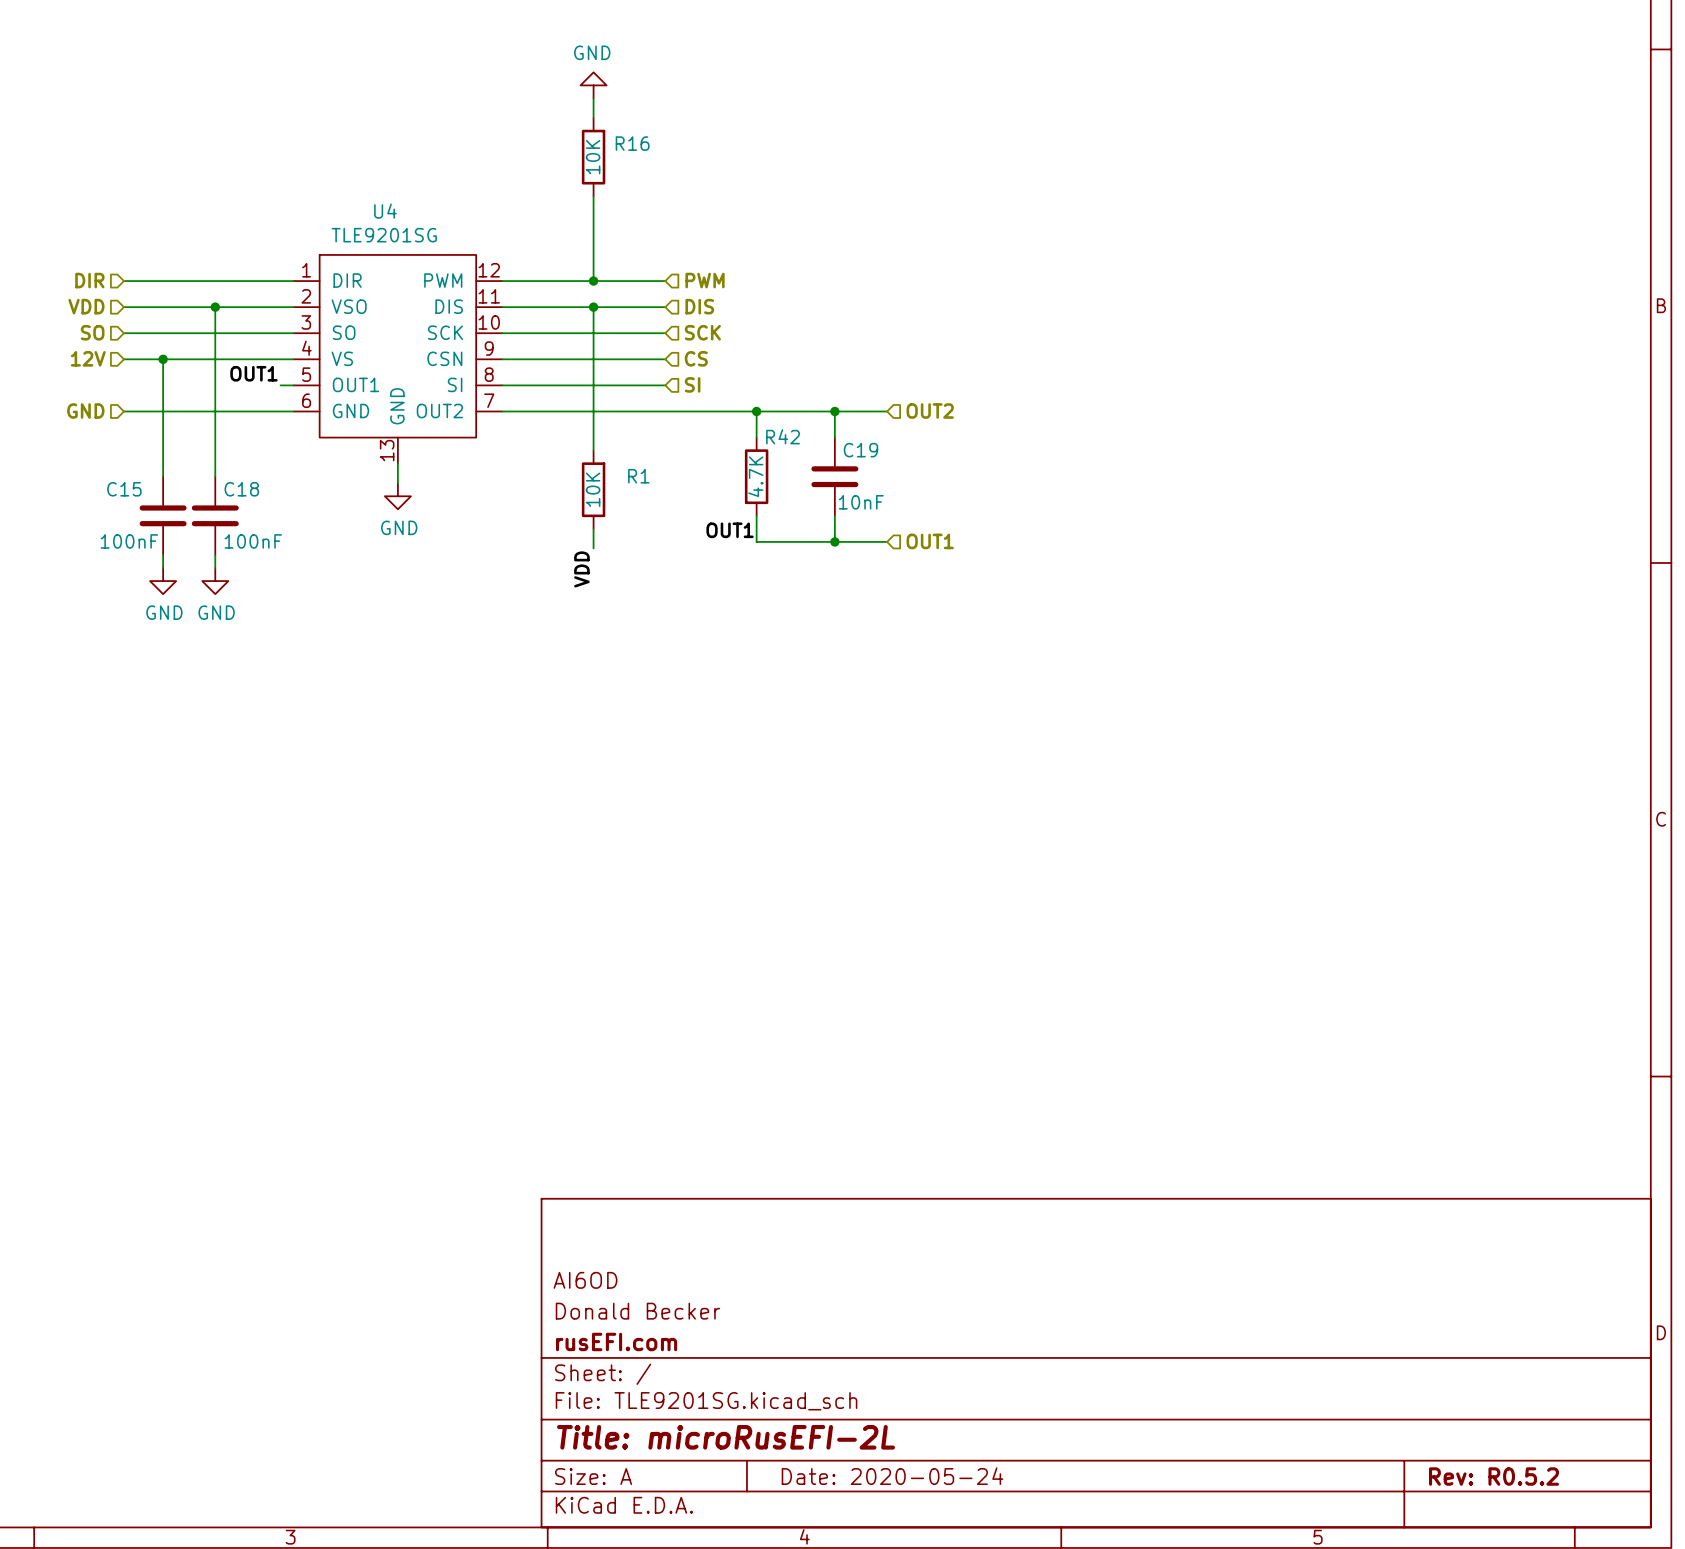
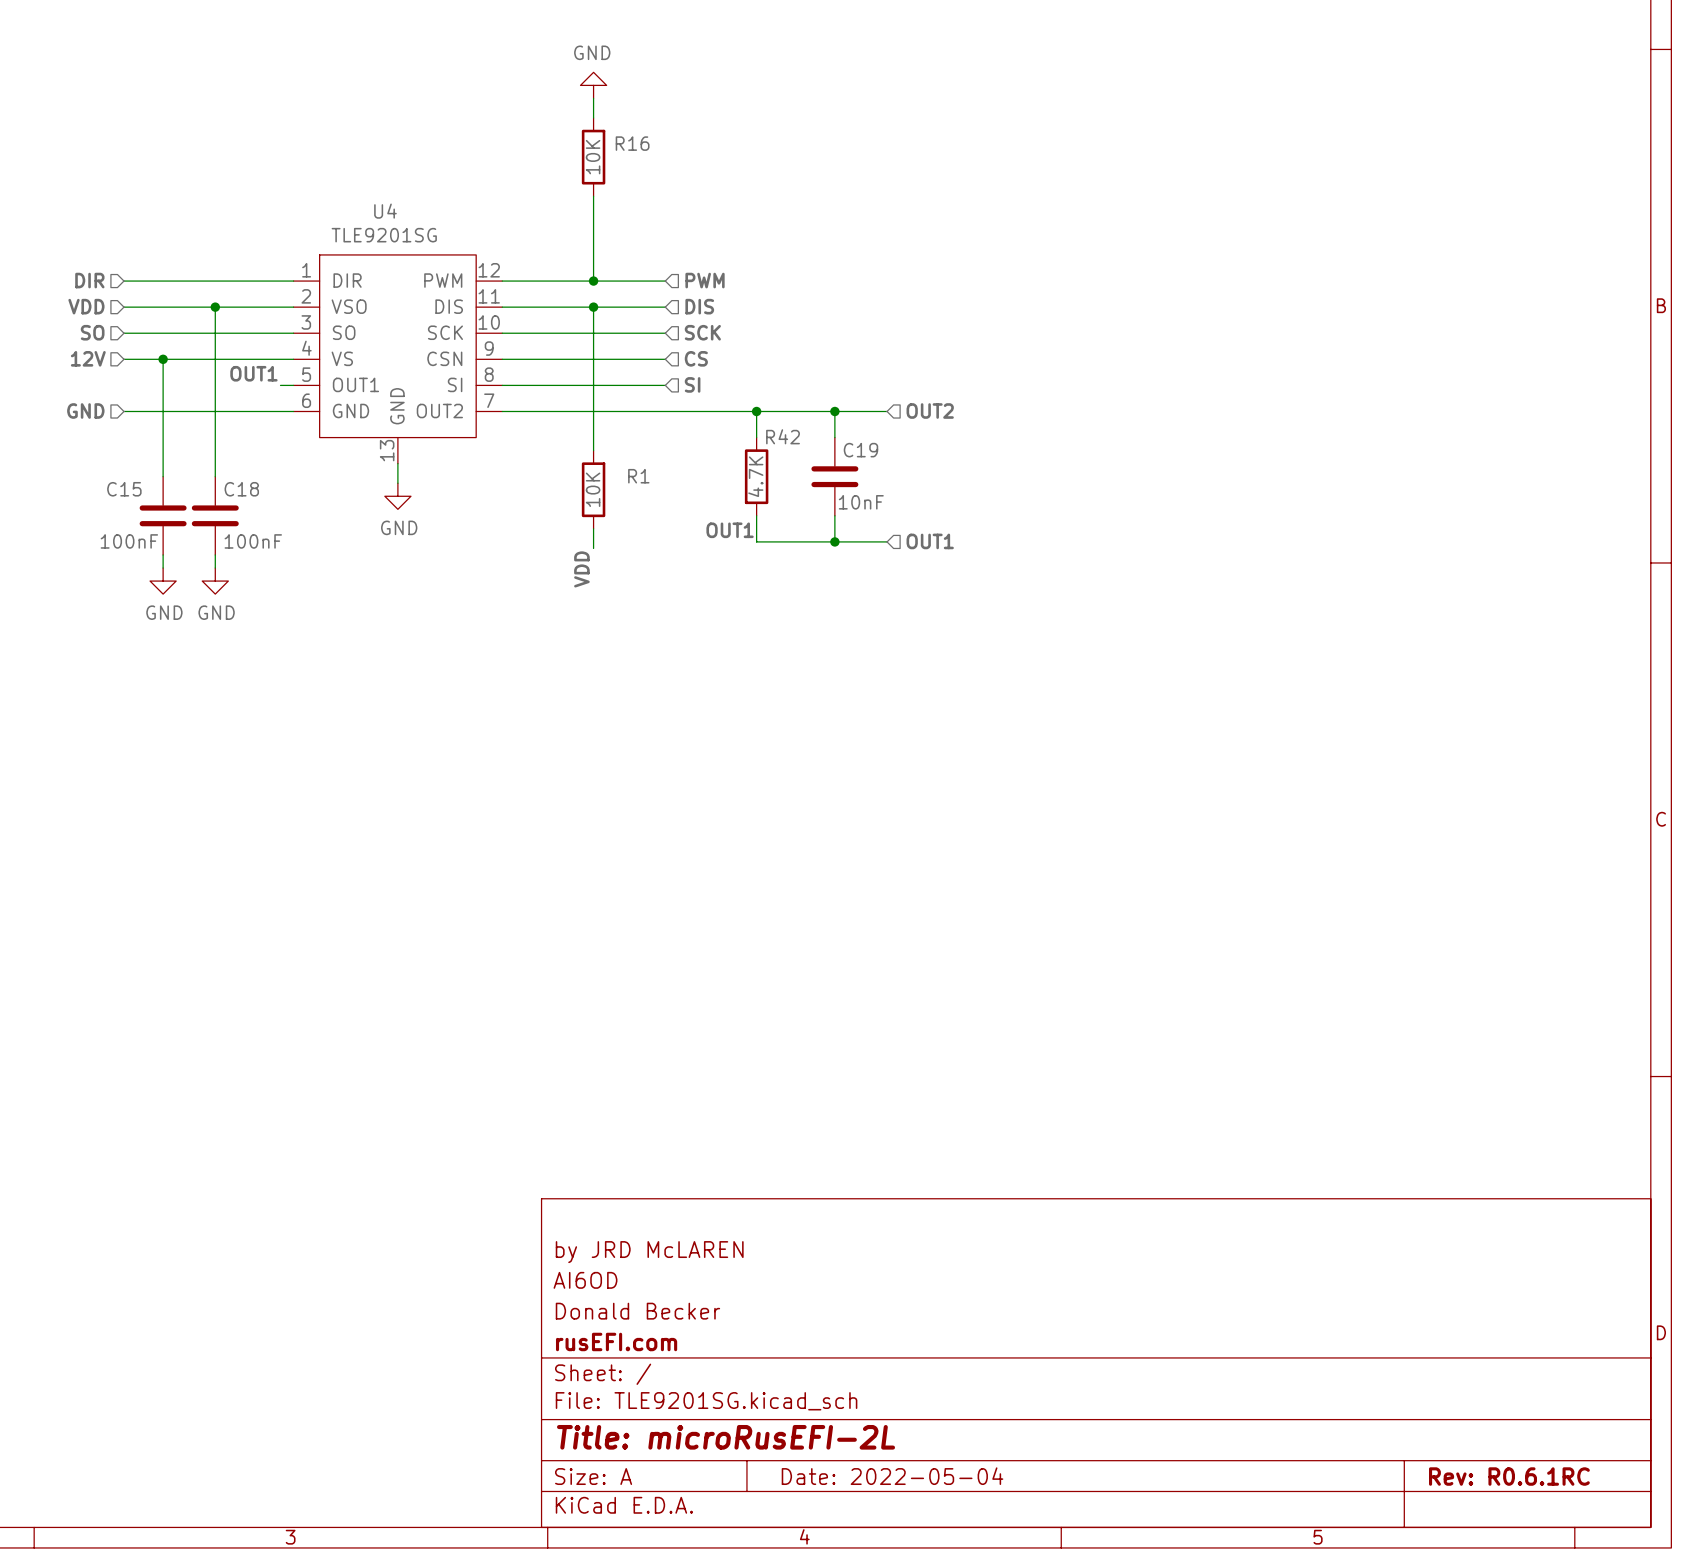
title block: none -> by JRD McLAREN (649, 1252)
title block: Date: 2020-05-24 (892, 1476) -> Date: 2022-05-04 (892, 1476)
title block: Rev: R0.5.2 (1494, 1476) -> Rev: R0.6.1RC (1509, 1476)

